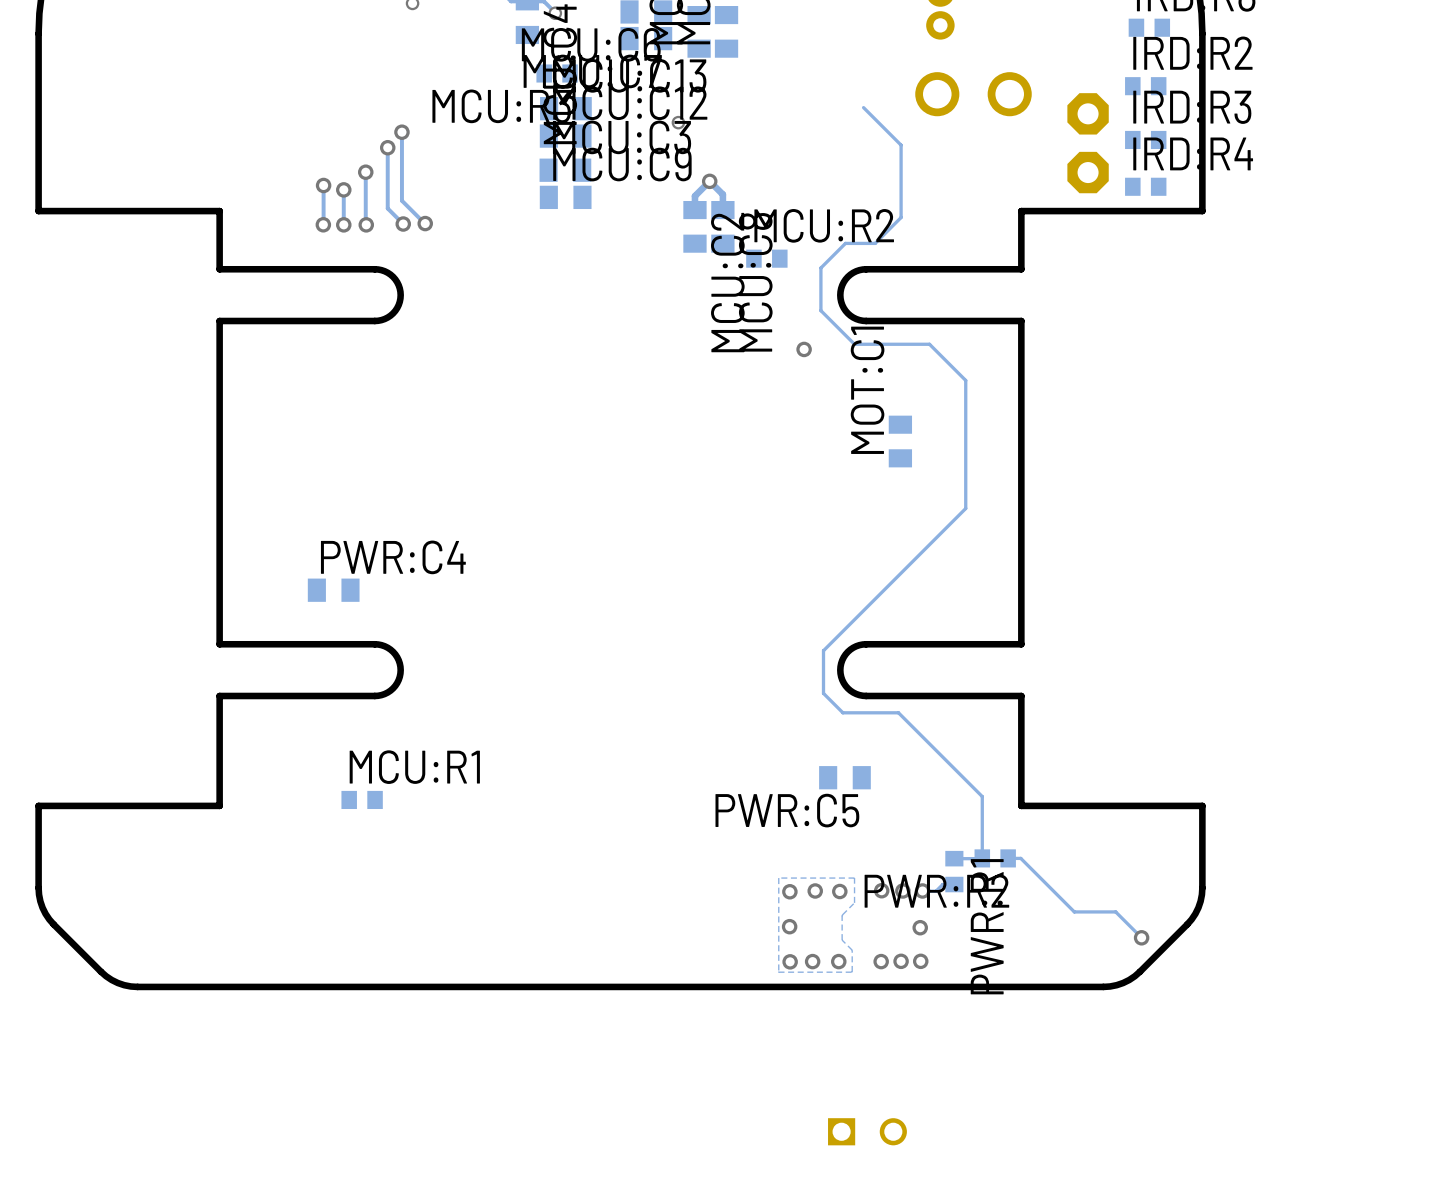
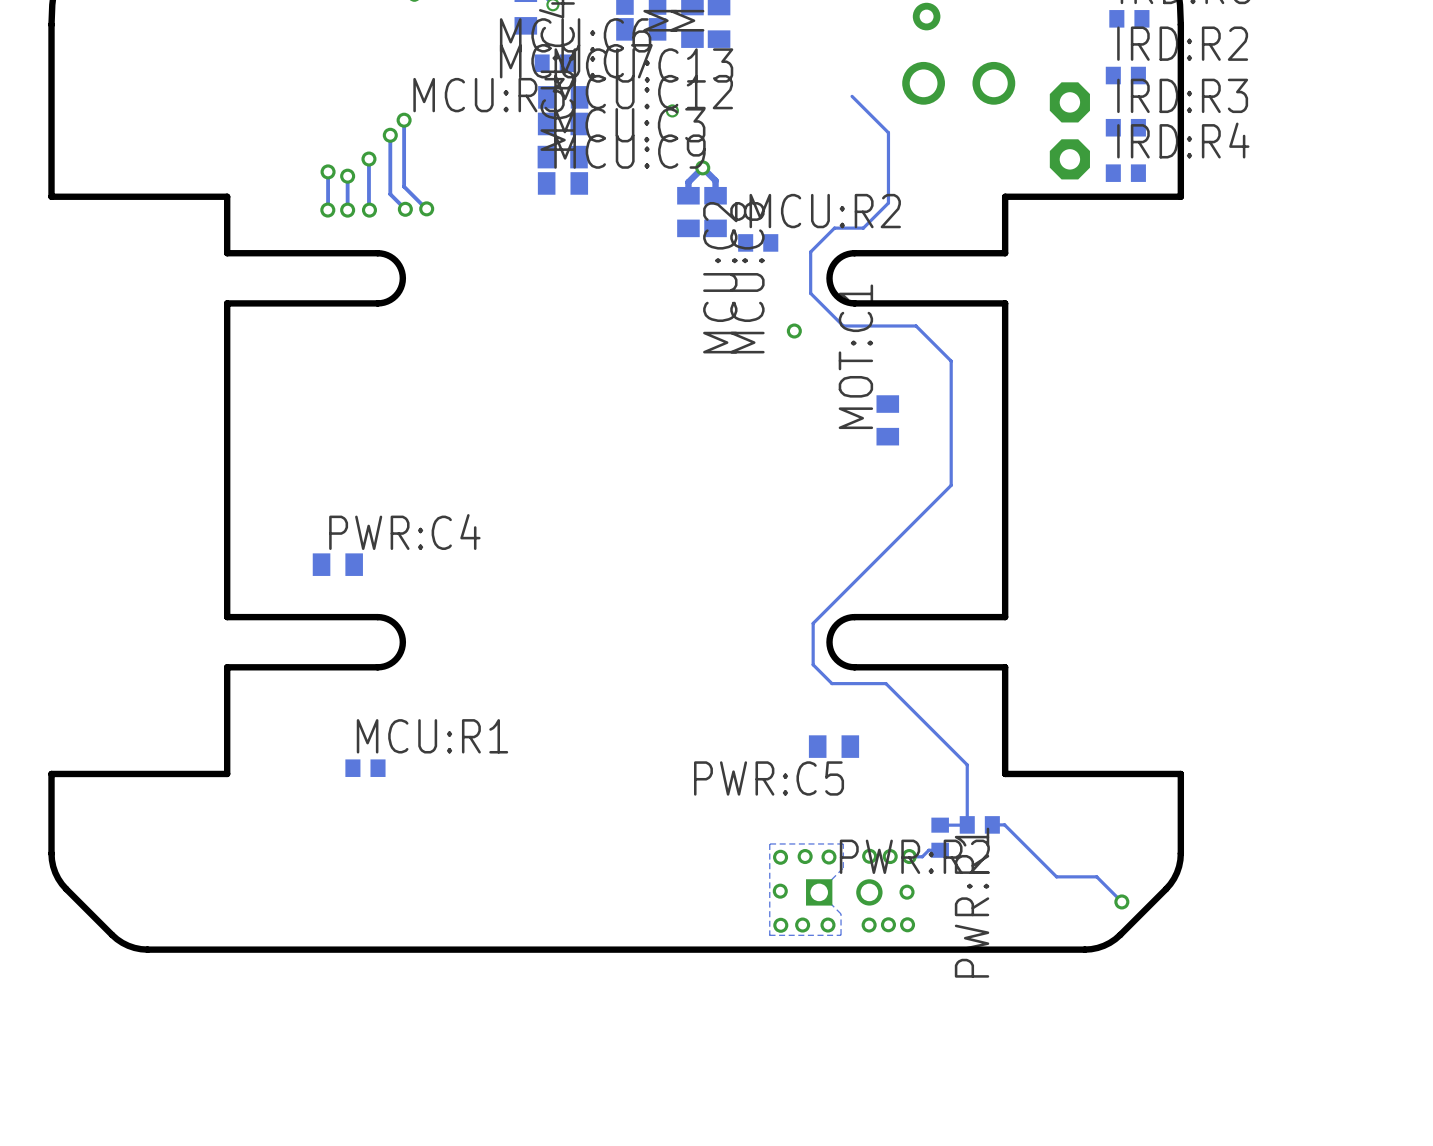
part position: (867, 1131) -> (844, 892)

